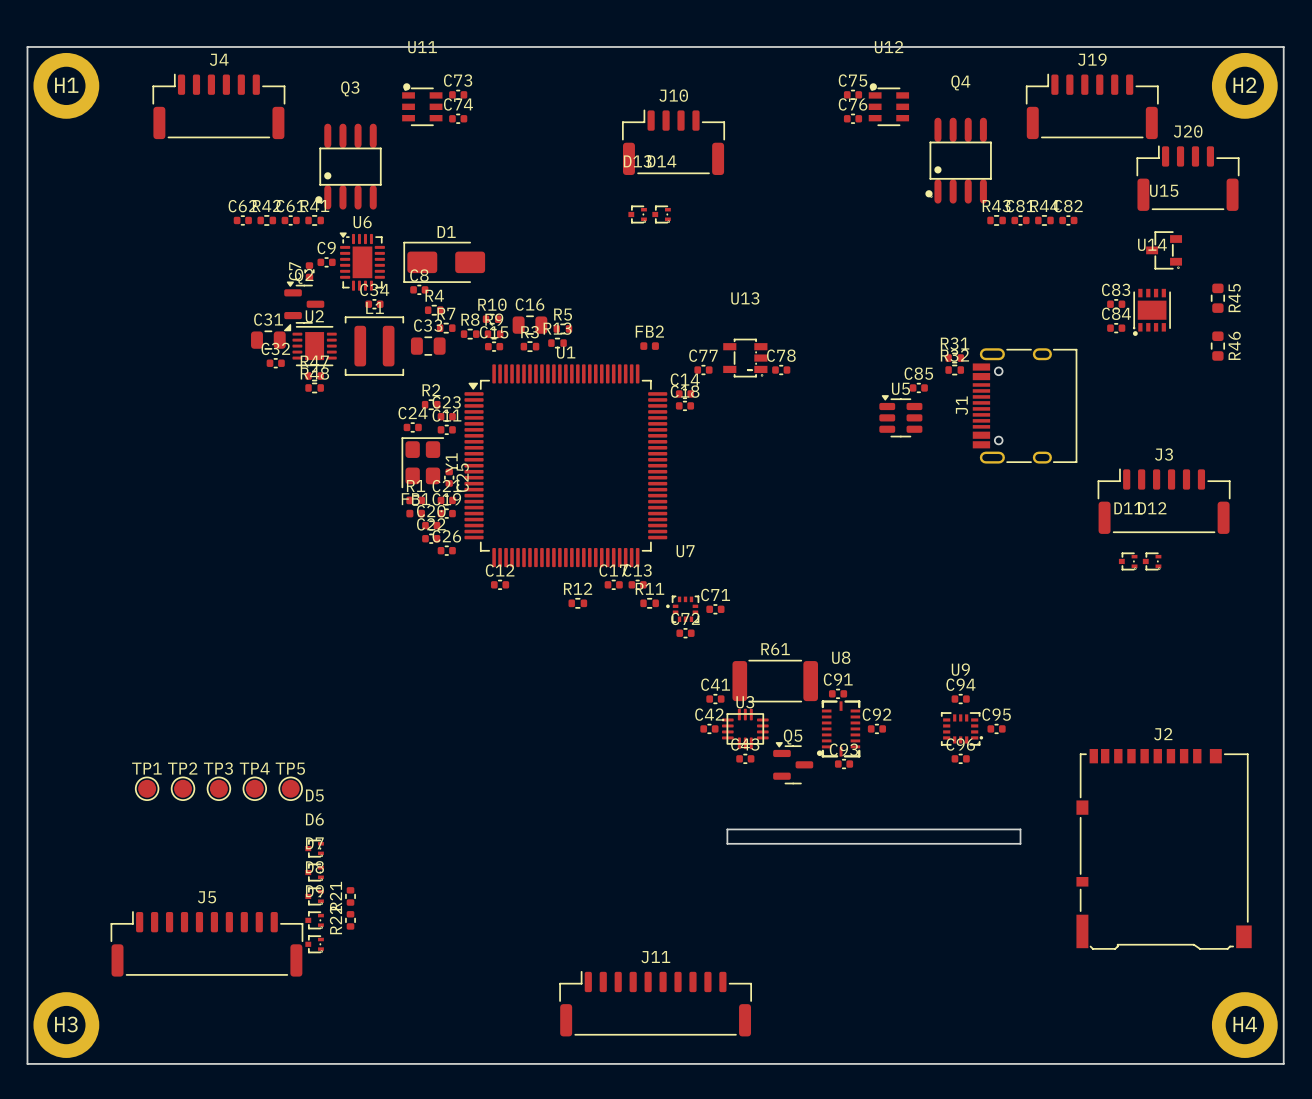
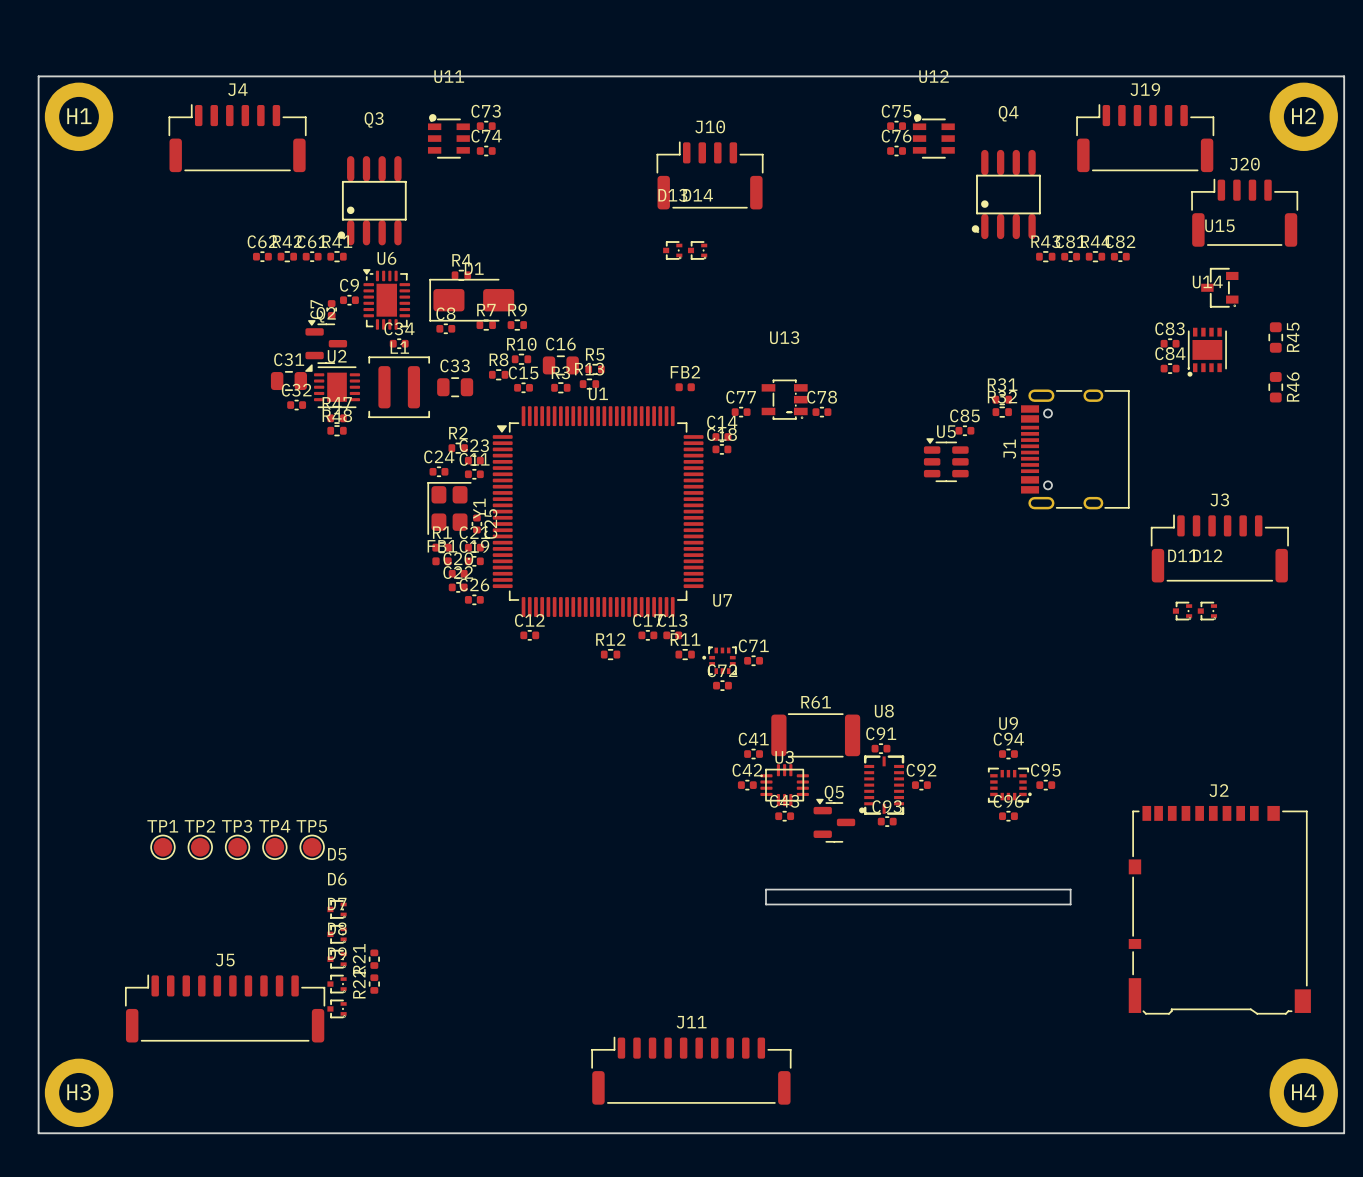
R4 position: (434, 310) -> (461, 275)
R7 position: (446, 328) -> (486, 325)
R9 position: (494, 334) -> (517, 325)

